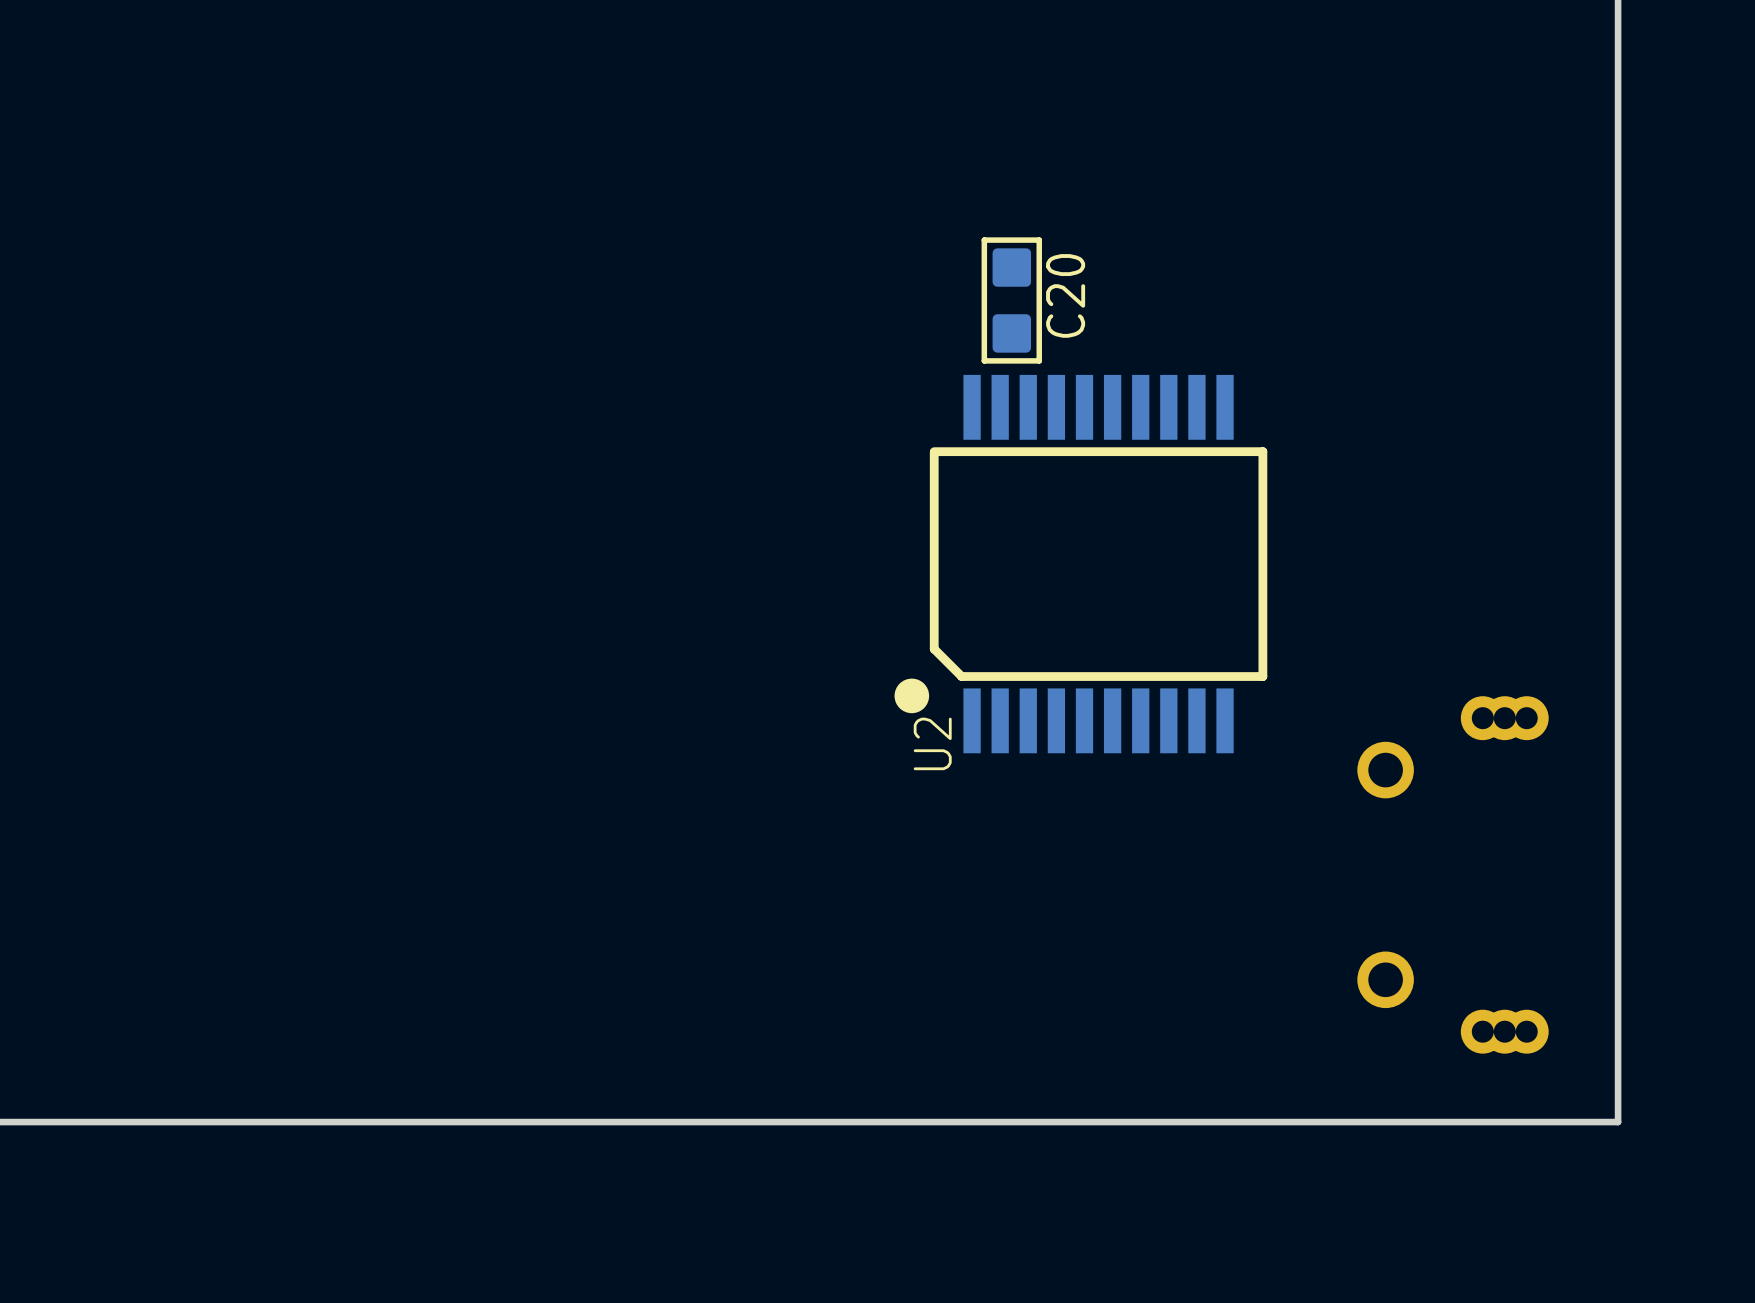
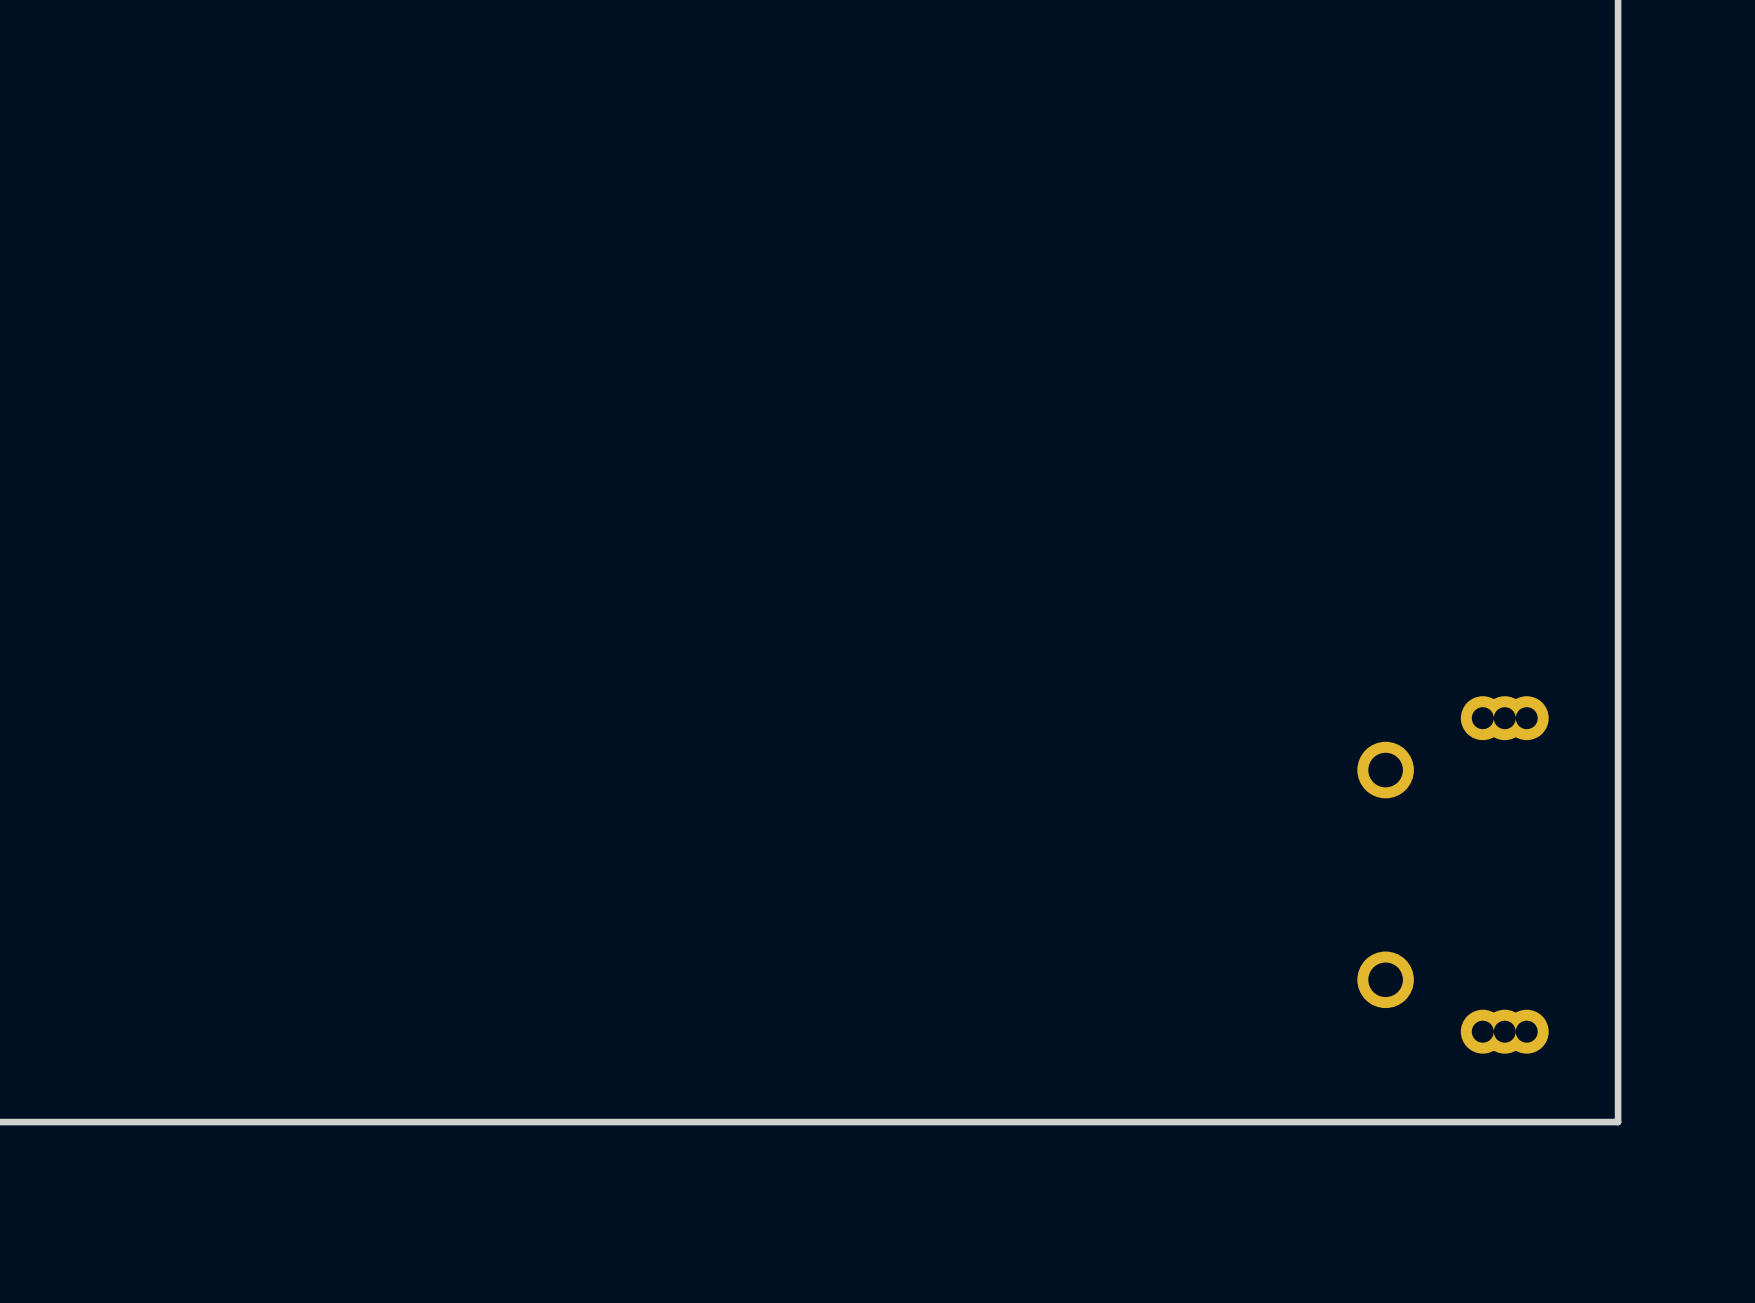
C20: (1011, 300) -> none
U2: (1080, 564) -> none

